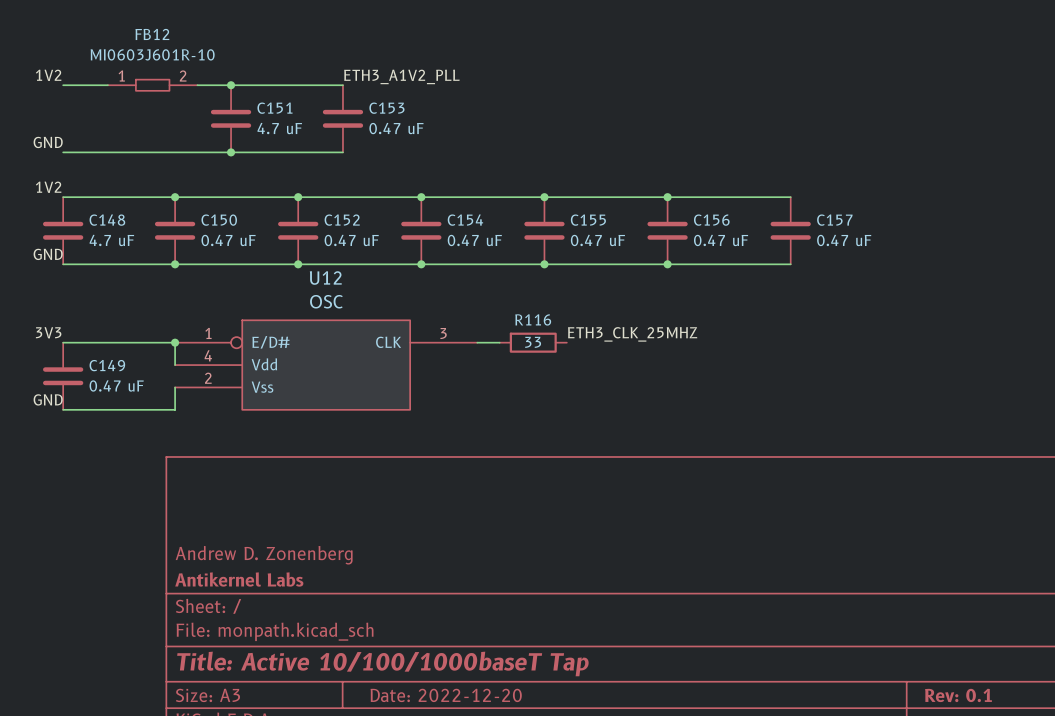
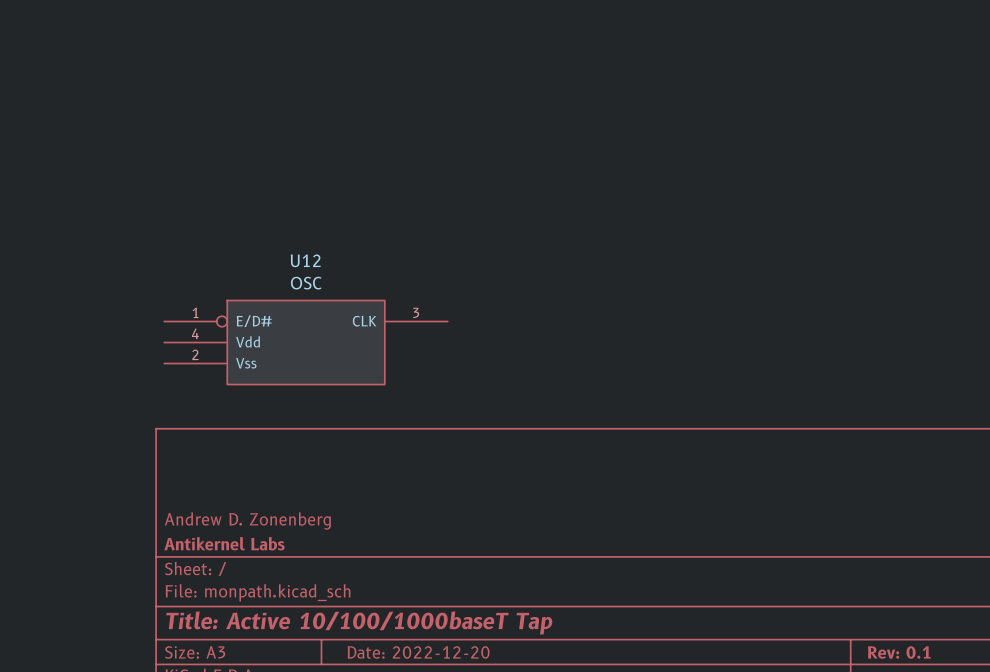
label: 1V2 (48, 75) -> none
label: ETH3_A1V2_PLL (401, 76) -> none
wire: (63, 85) (107, 85) -> none
FB12: MI0603J601R-10 (152, 85) -> none
wire: (197, 85) (342, 85) -> none
junction: (231, 85) -> none
C151: 4.7 uF (231, 118) -> none
C153: 0.47 uF (342, 118) -> none
label: GND (48, 142) -> none
wire: (63, 152) (342, 152) -> none
junction: (231, 152) -> none
label: 1V2 (48, 187) -> none
wire: (63, 197) (790, 197) -> none
junction: (175, 197) -> none
junction: (298, 197) -> none
junction: (421, 197) -> none
junction: (544, 197) -> none
junction: (667, 197) -> none
C148: 4.7 uF (63, 230) -> none
C150: 0.47 uF (175, 230) -> none
C152: 0.47 uF (298, 230) -> none
C154: 0.47 uF (421, 230) -> none
C155: 0.47 uF (544, 230) -> none
C156: 0.47 uF (667, 230) -> none
C157: 0.47 uF (790, 230) -> none
label: GND (48, 254) -> none
wire: (63, 264) (790, 264) -> none
junction: (175, 264) -> none
junction: (298, 264) -> none
junction: (421, 264) -> none
junction: (544, 264) -> none
junction: (667, 264) -> none
label: 3V3 (48, 332) -> none
label: ETH3_CLK_25MHZ (632, 334) -> none
wire: (63, 342) (175, 342) (175, 365) -> none
junction: (175, 342) -> none
wire: (477, 342) (499, 342) -> none
R116: 33 (533, 342) -> none
C149: 0.47 uF (63, 376) -> none
wire: (175, 387) (175, 409) (63, 409) -> none
label: GND (48, 399) -> none

